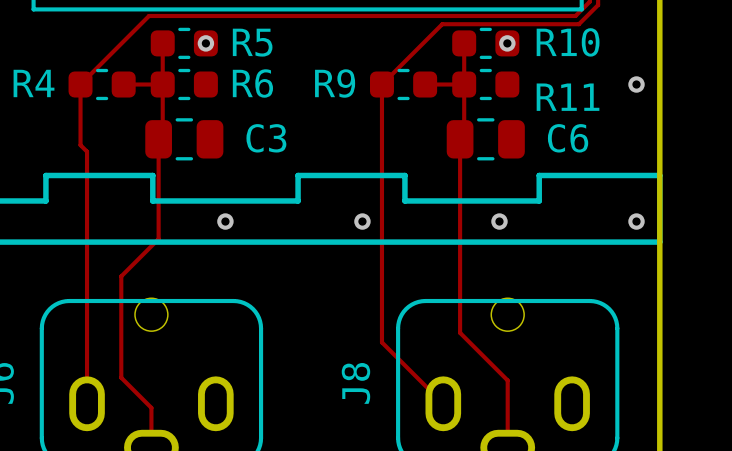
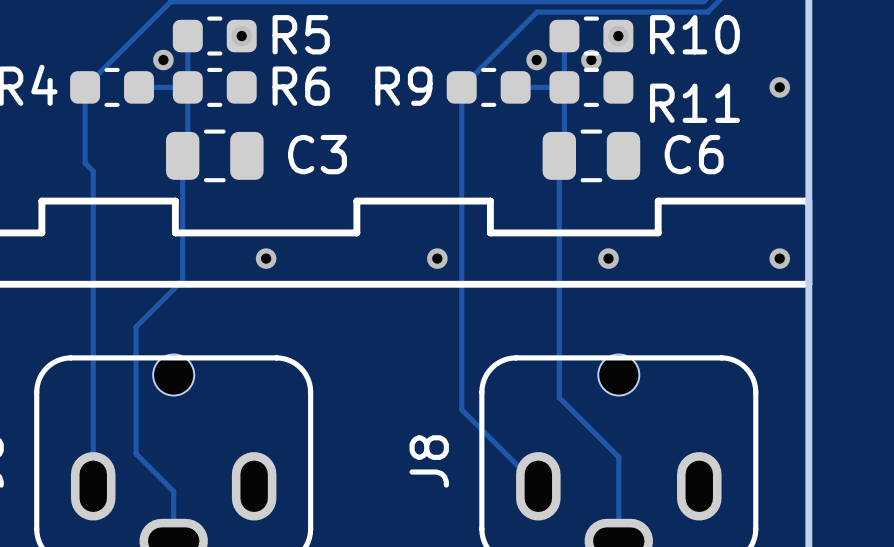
via: none -> (163, 60)
via: none -> (536, 60)
via: none -> (591, 60)

